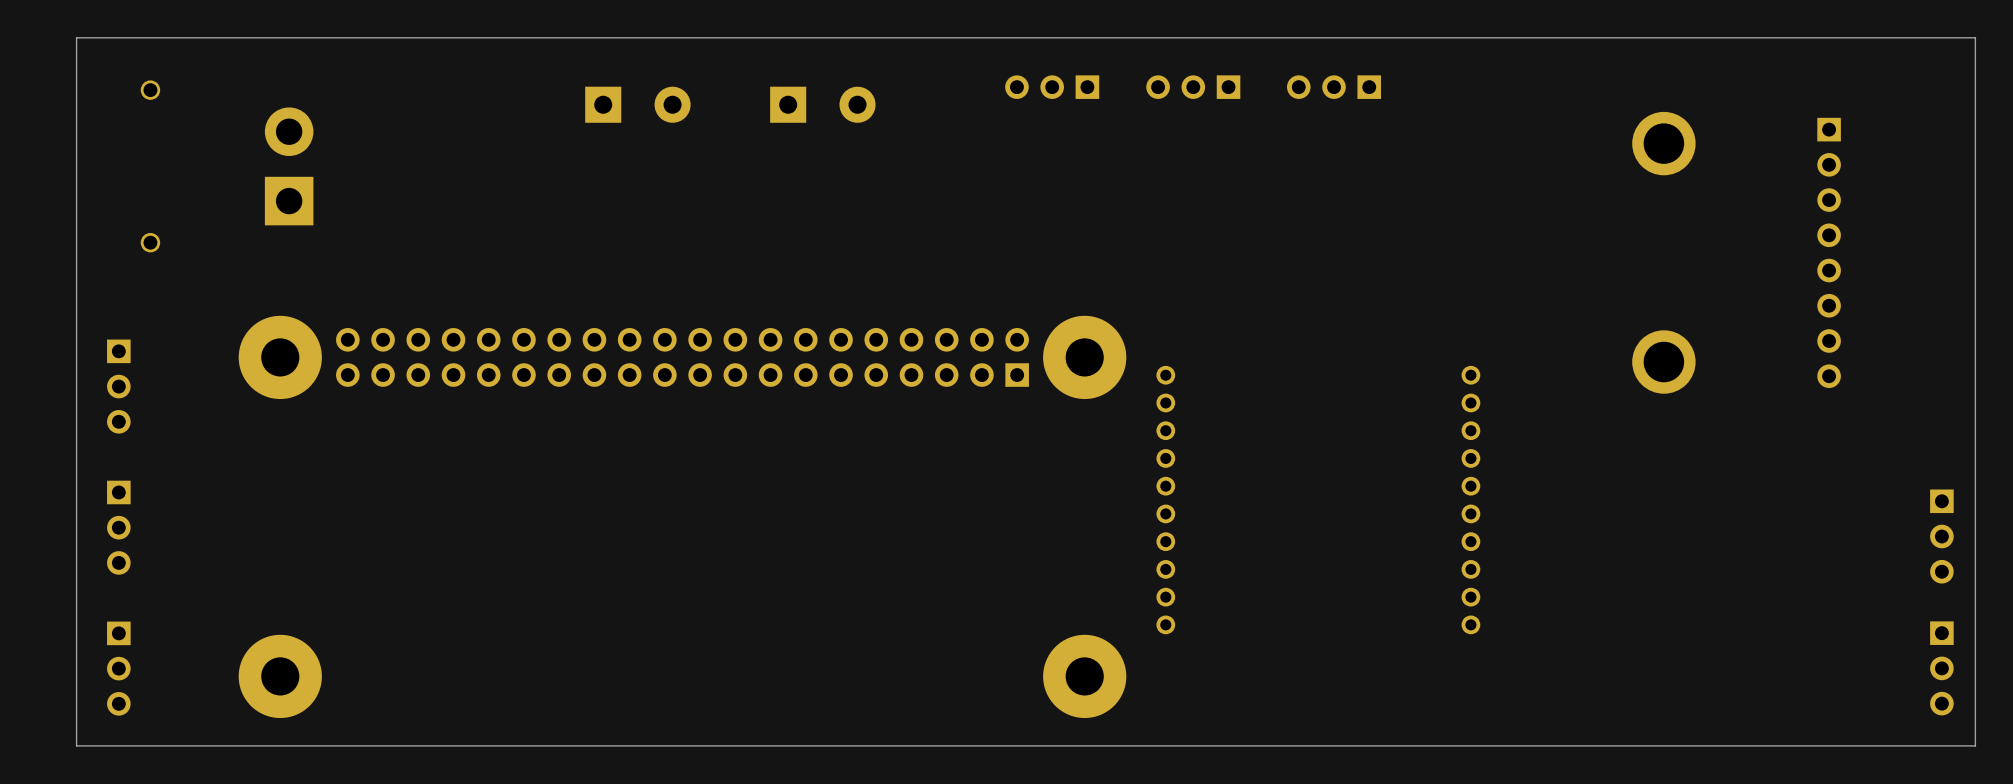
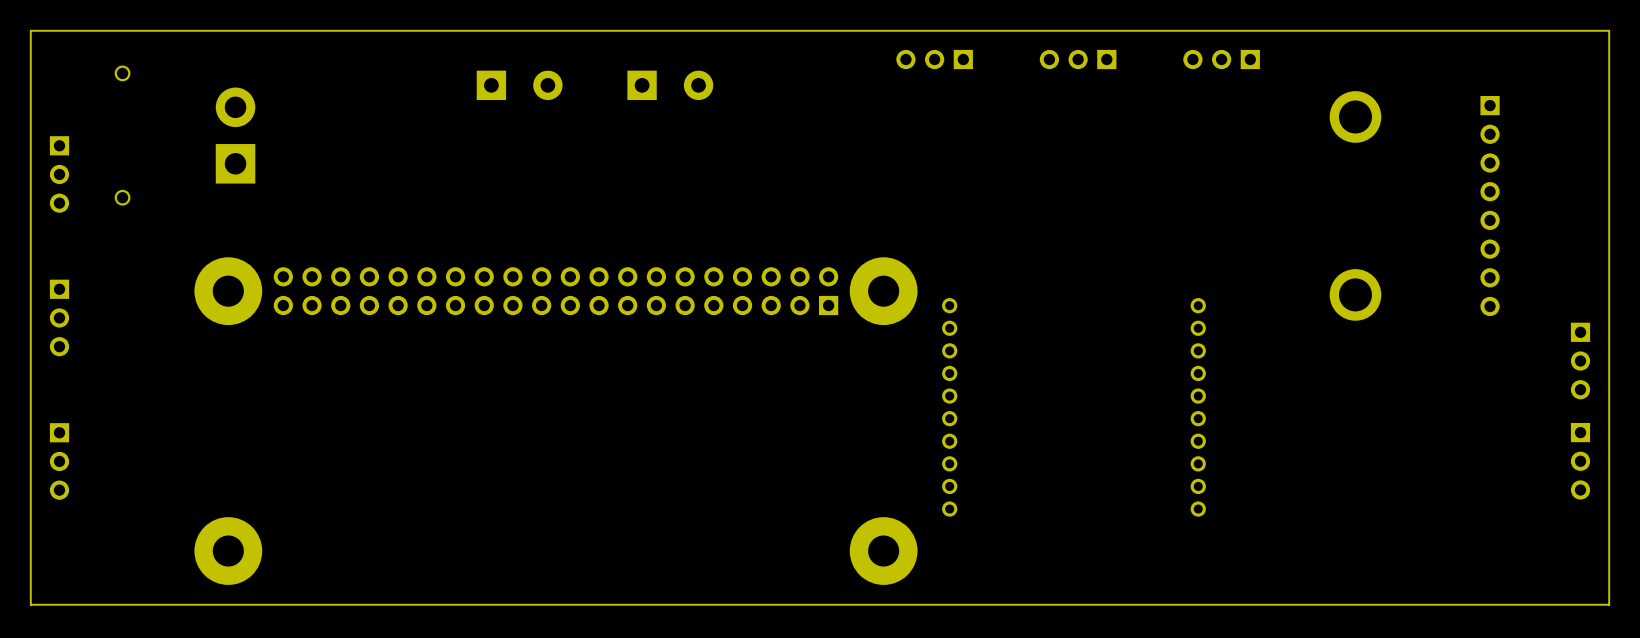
board edge: (76, 37) (76, 745) (1975, 745) (1975, 742) -> (62, 30) (30, 30) (30, 604) (1609, 604)
part: none -> (934, 59)
part: none -> (1221, 59)
part: (1052, 87) -> none
part: (1193, 87) -> none
part position: (1334, 87) -> (1078, 59)
part: none -> (59, 174)
part position: (118, 386) -> (59, 317)
part: none -> (1580, 361)
part: (118, 527) -> none
part position: (1941, 536) -> (1580, 461)
part: none -> (59, 461)
part: (118, 668) -> none
part: (1941, 668) -> none

